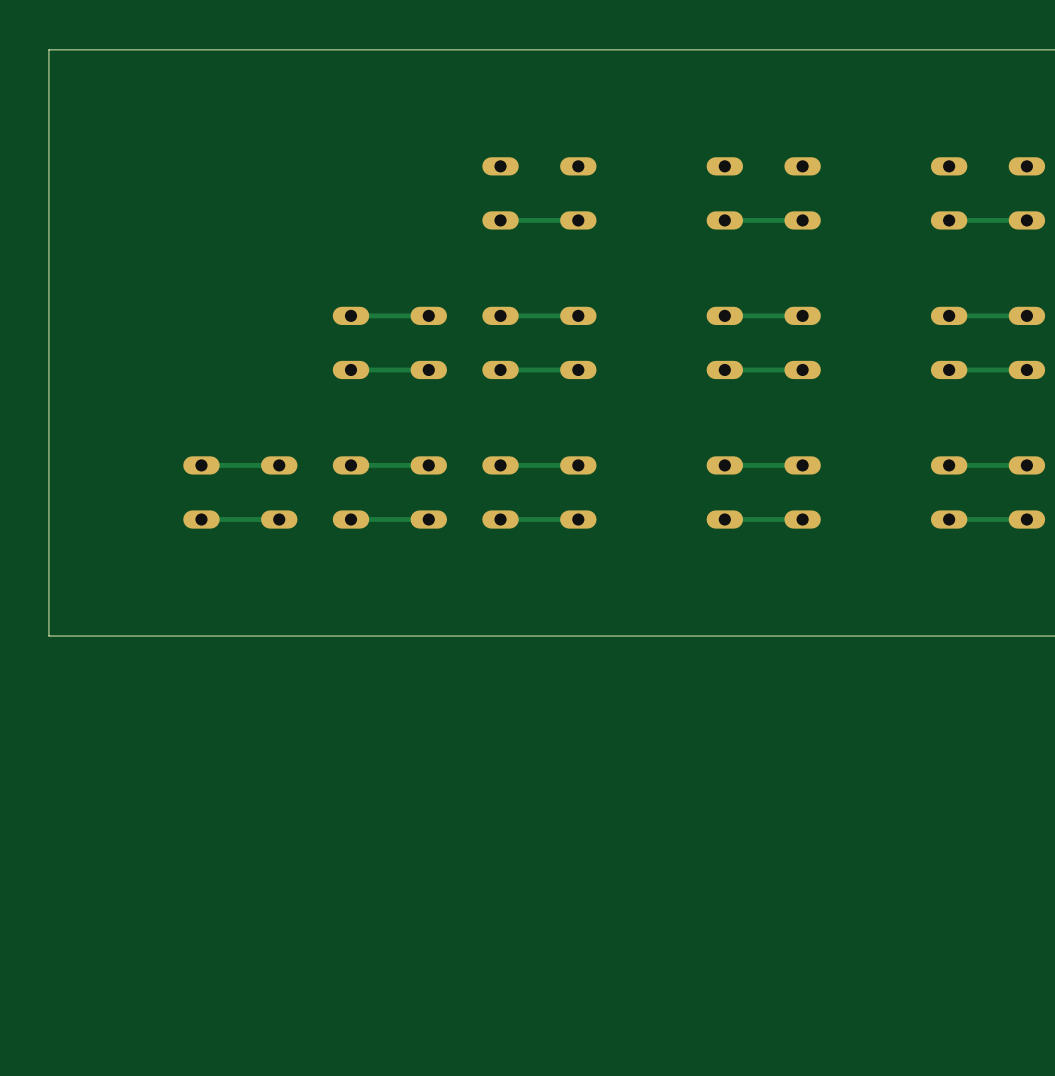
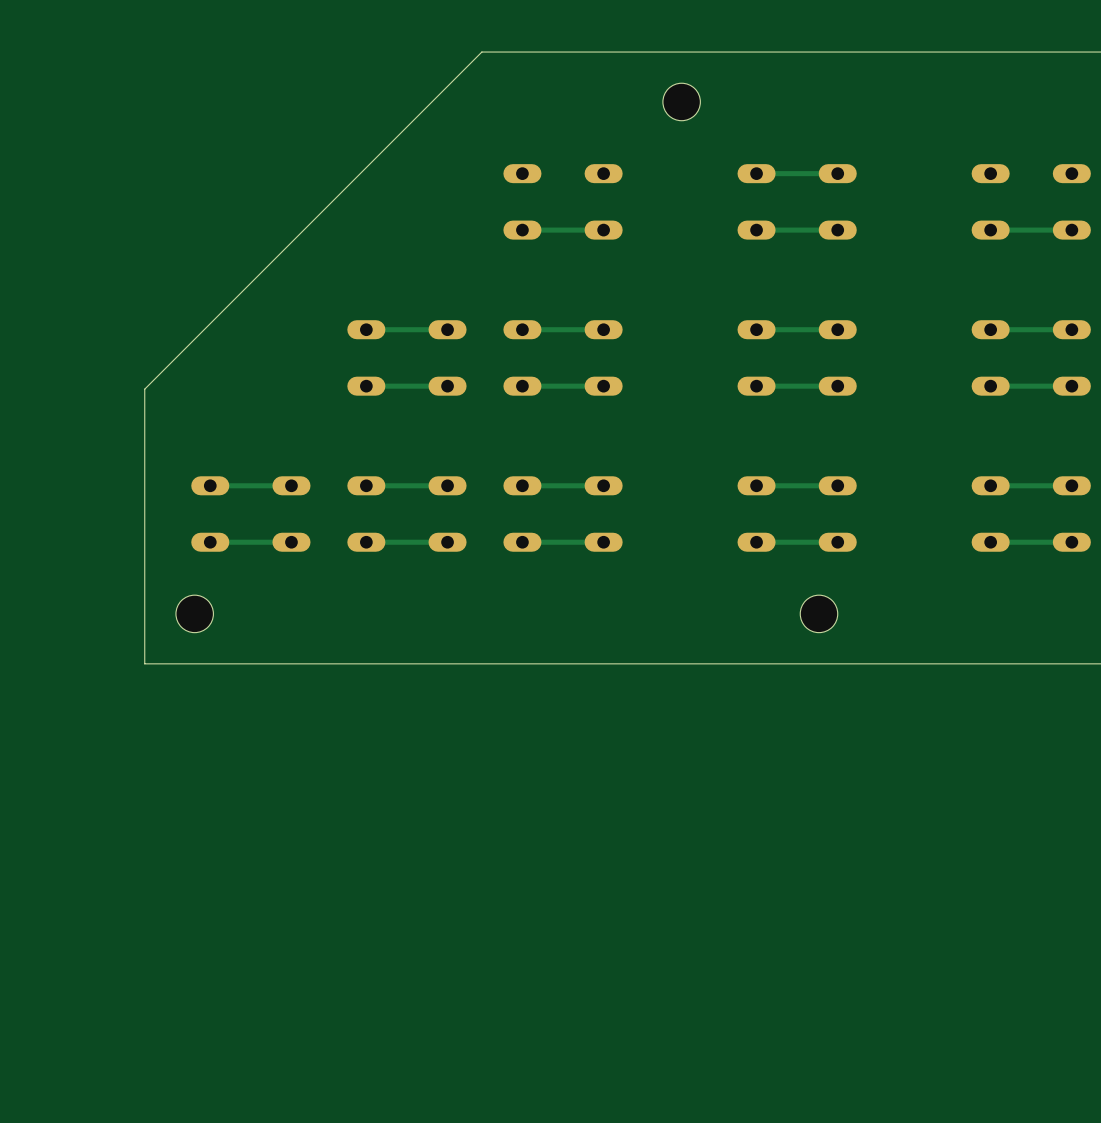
board edge: (461, 49) (48, 49) (48, 636) (138, 636) -> (481, 52) (144, 389) (144, 663)
hole: none -> (681, 101)
track: none -> (837, 173) (756, 173)
hole: none -> (194, 613)
hole: none -> (818, 613)

